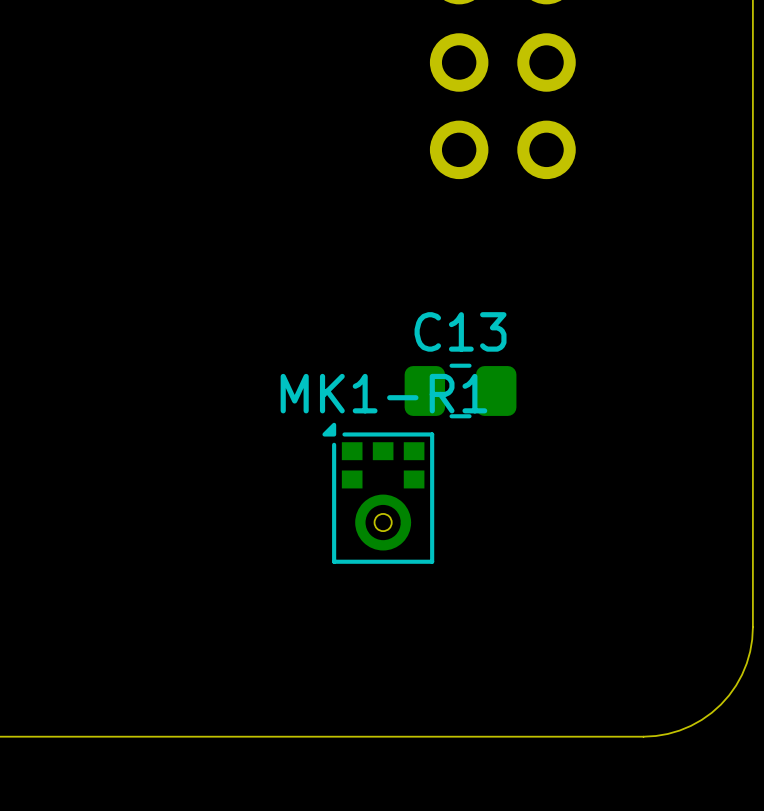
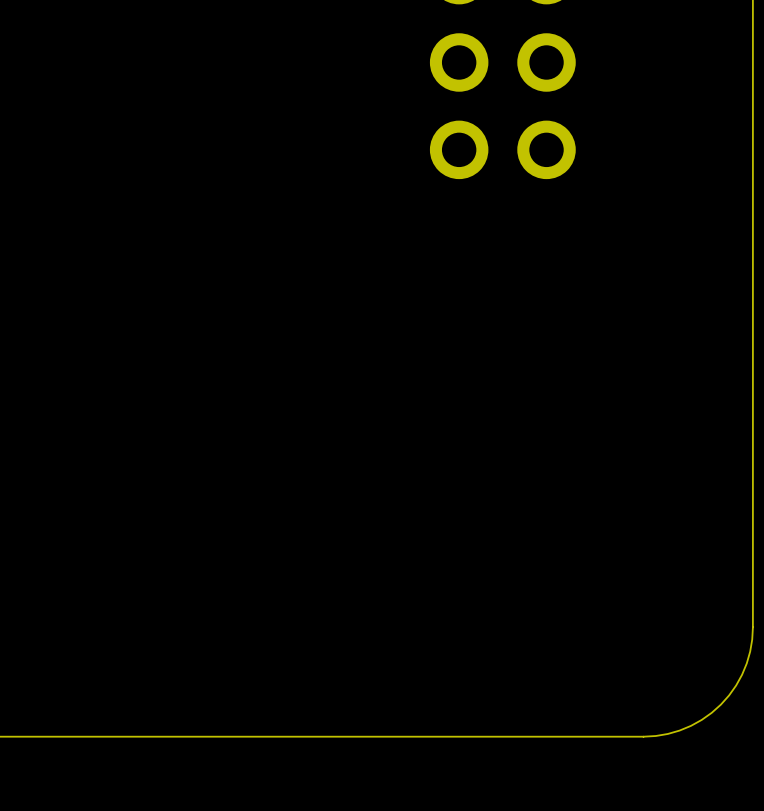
C13: (460, 390) -> none
MK1-R1: (378, 493) -> none

